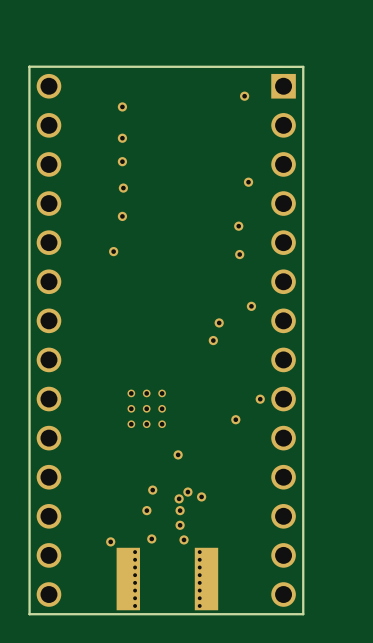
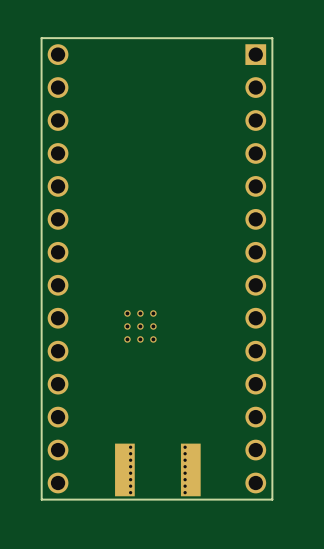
part: (244, 96) -> none
part: (122, 106) -> none
part: (122, 138) -> none
part: (122, 161) -> none
part: (248, 182) -> none
part: (123, 188) -> none
part: (122, 216) -> none
part: (238, 226) -> none
part: (113, 251) -> none
part: (239, 254) -> none
part: (251, 306) -> none
part: (219, 322) -> none
part: (213, 340) -> none
part: (260, 399) -> none
part: (235, 419) -> none
part: (178, 454) -> none
part: (152, 490) -> none
part: (187, 492) -> none
part: (201, 496) -> none
part: (179, 498) -> none
part: (146, 510) -> none
part: (180, 510) -> none
part: (180, 525) -> none
part: (151, 538) -> none
part: (184, 539) -> none
part: (110, 541) -> none

